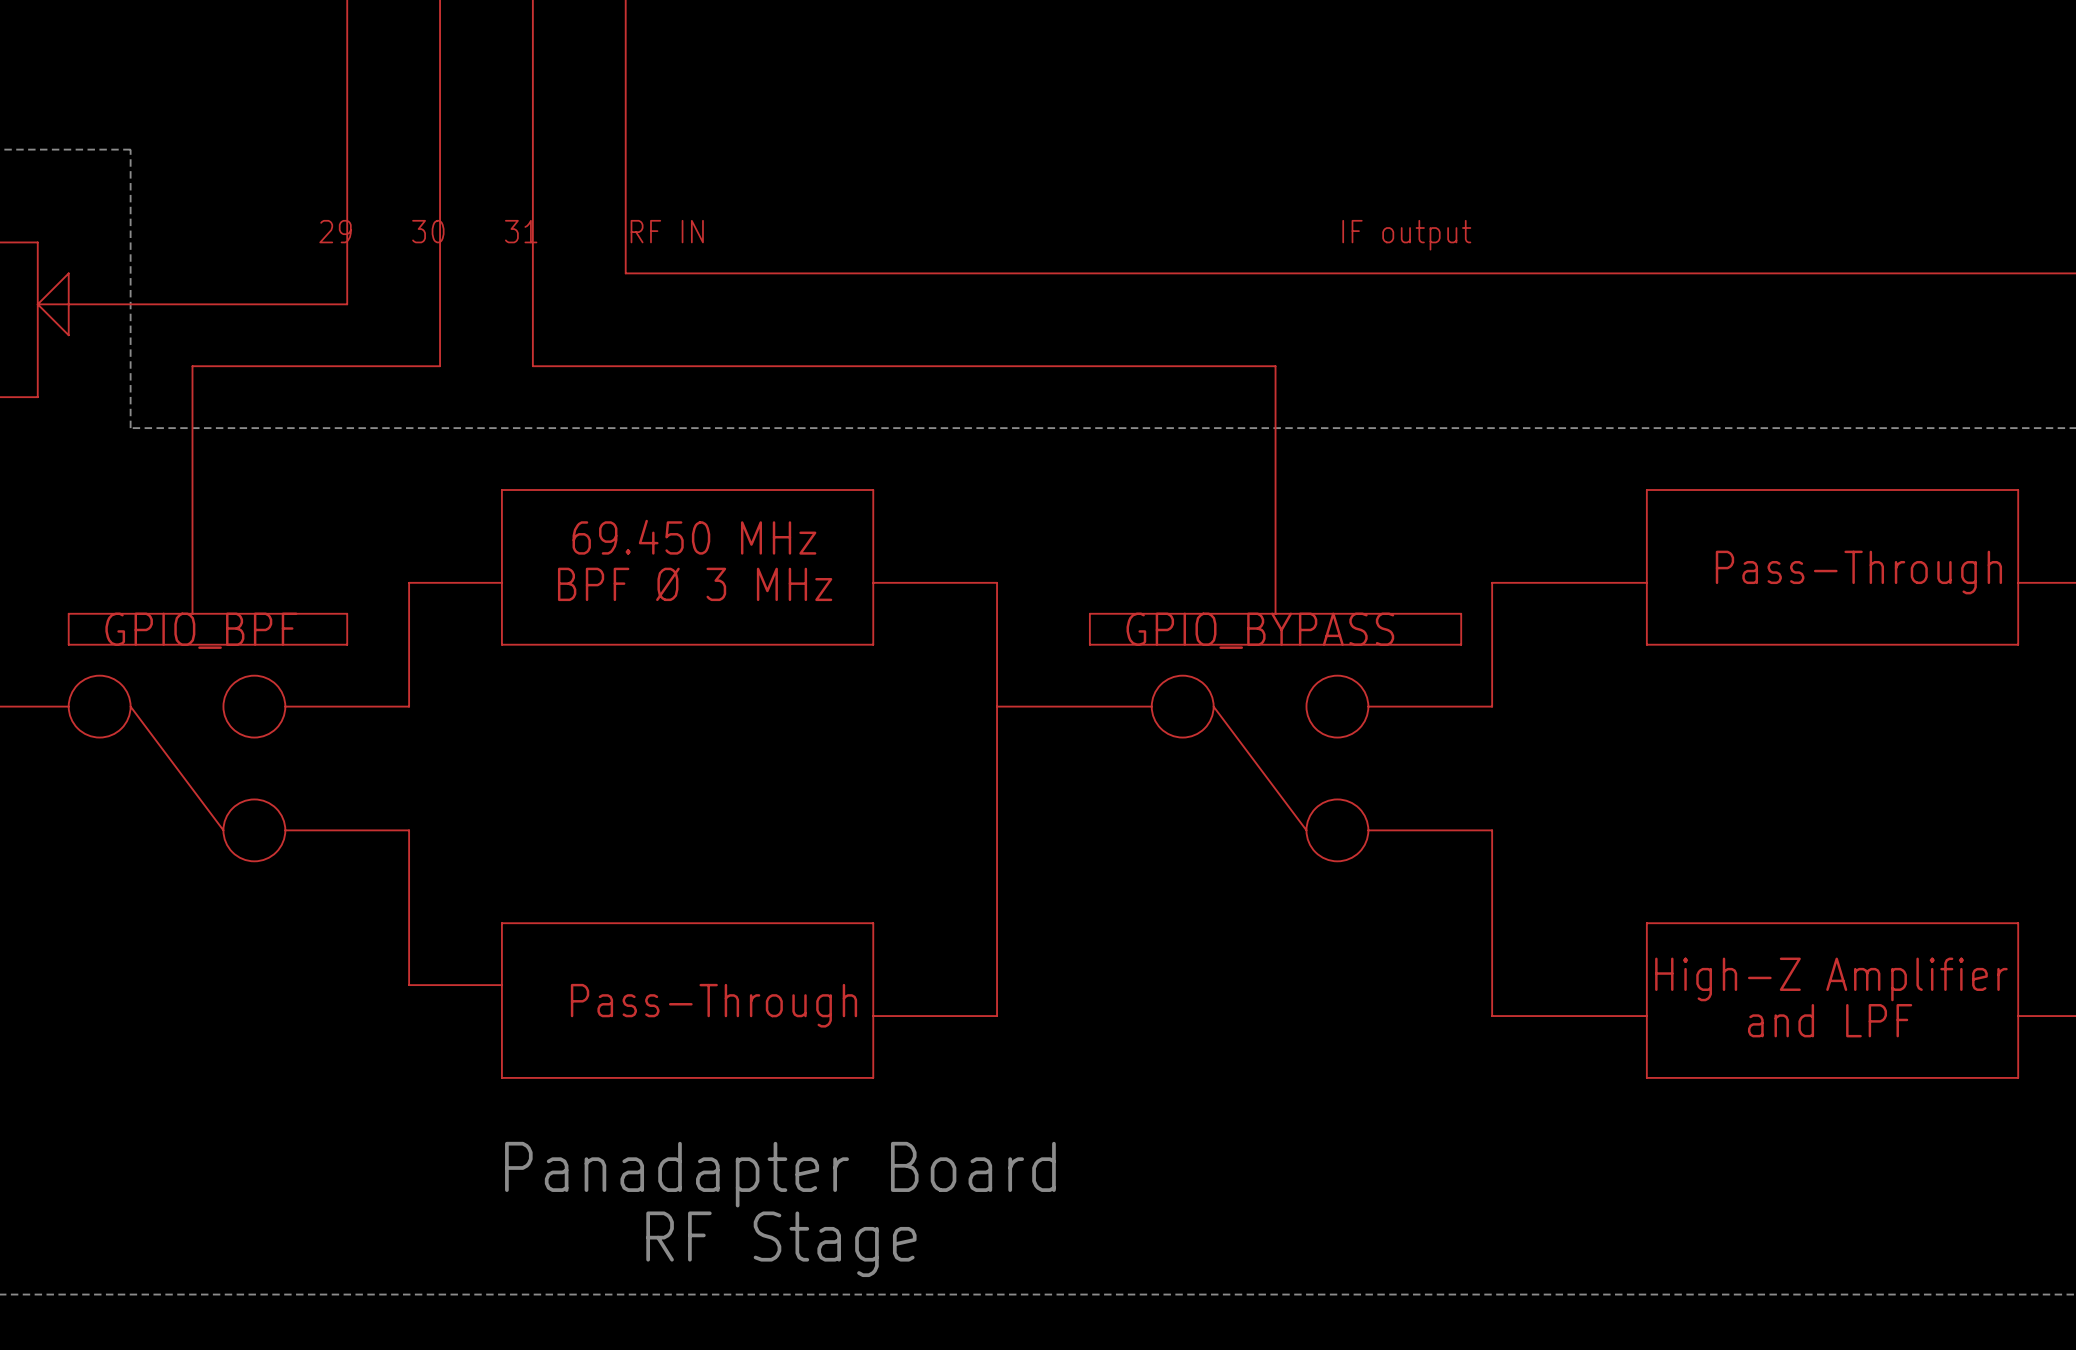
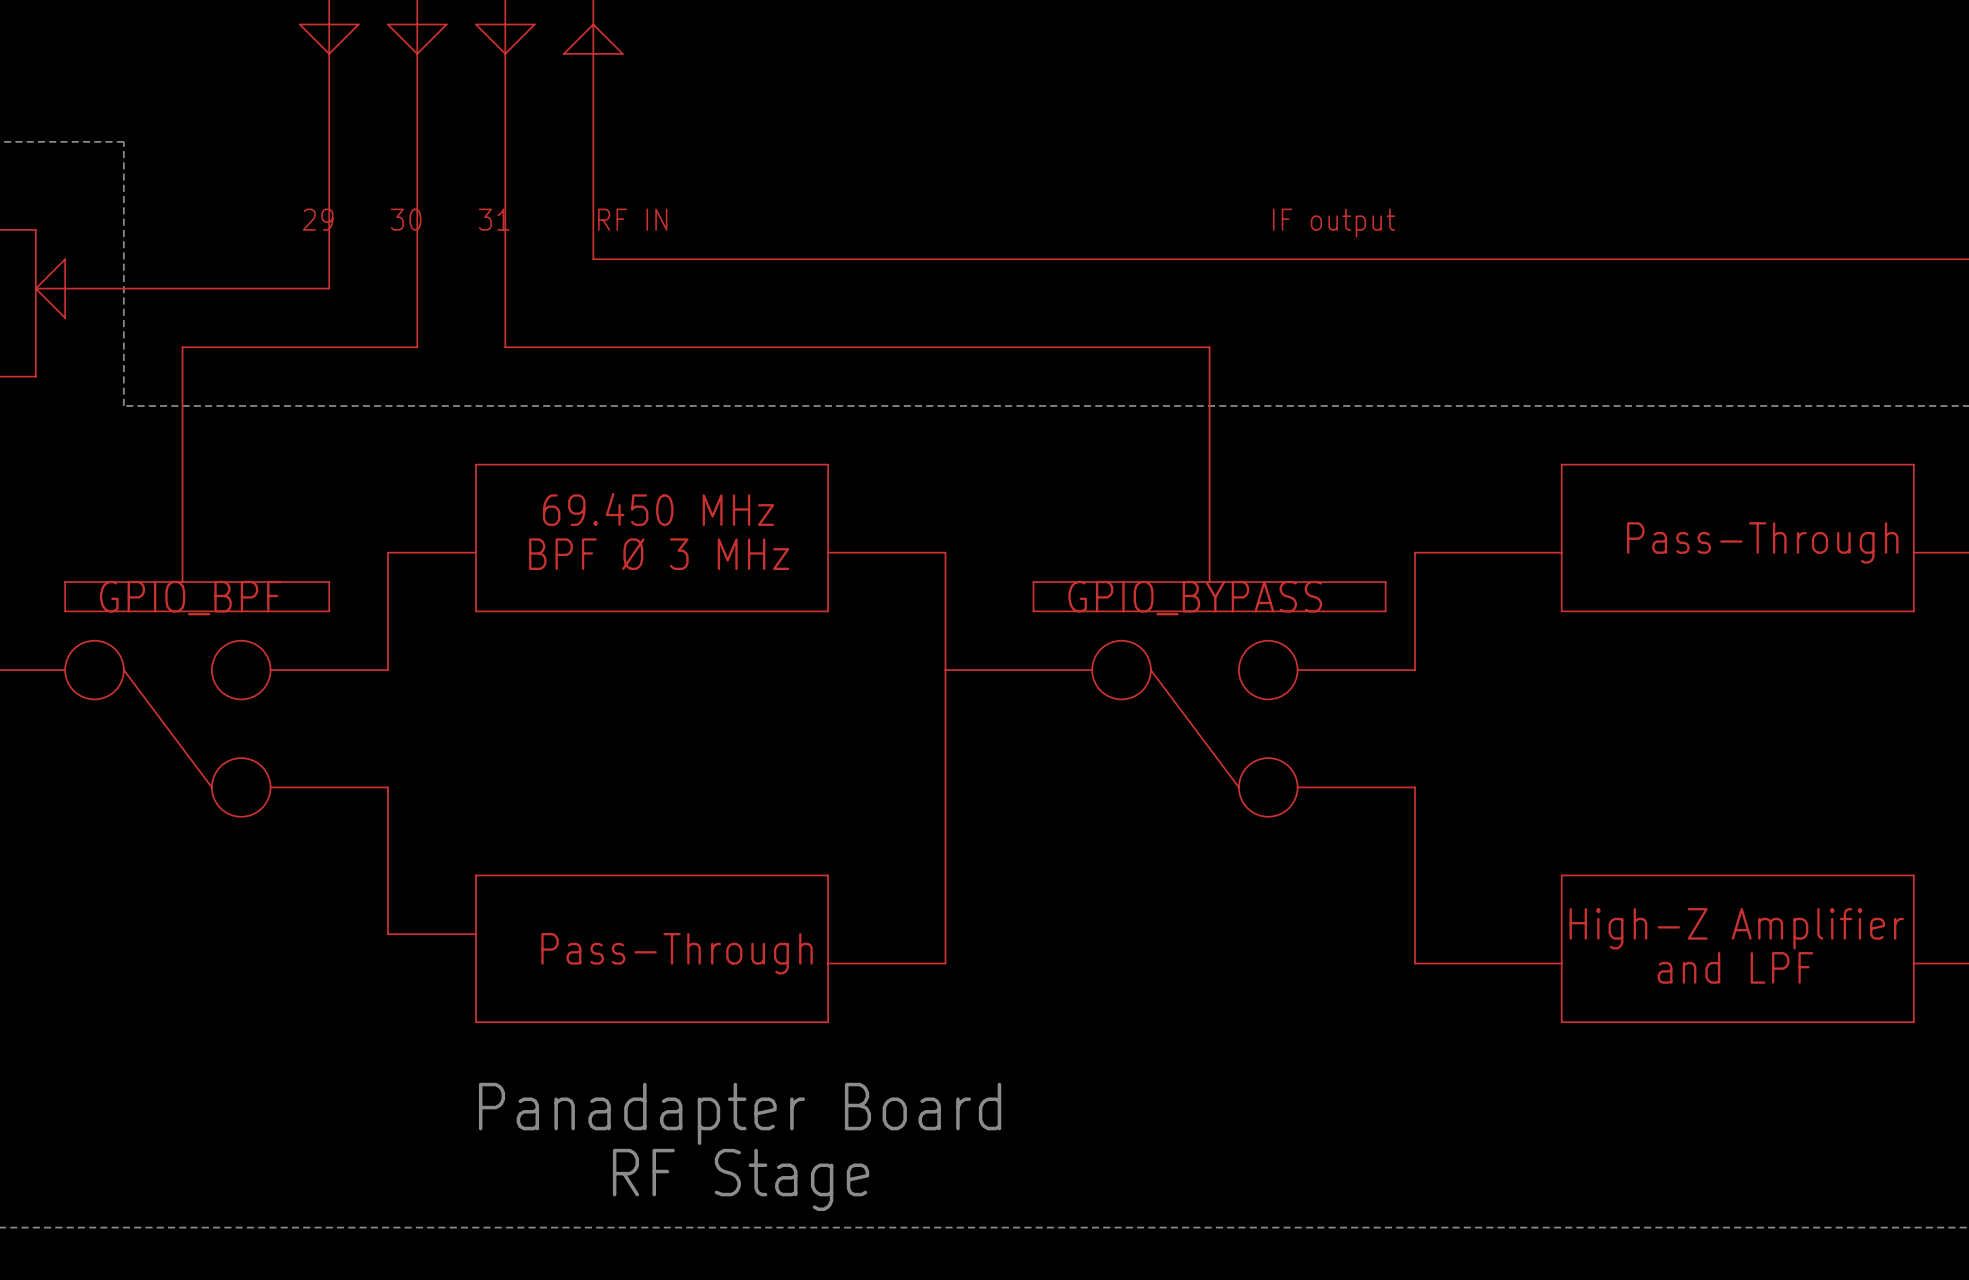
line: none -> (299, 24) (358, 24) (329, 53) (299, 24)
line: none -> (387, 24) (446, 24) (417, 53) (387, 24)
line: none -> (475, 24) (534, 24) (505, 53) (475, 24)
line: none -> (593, 24) (564, 53) (622, 53) (593, 24)

